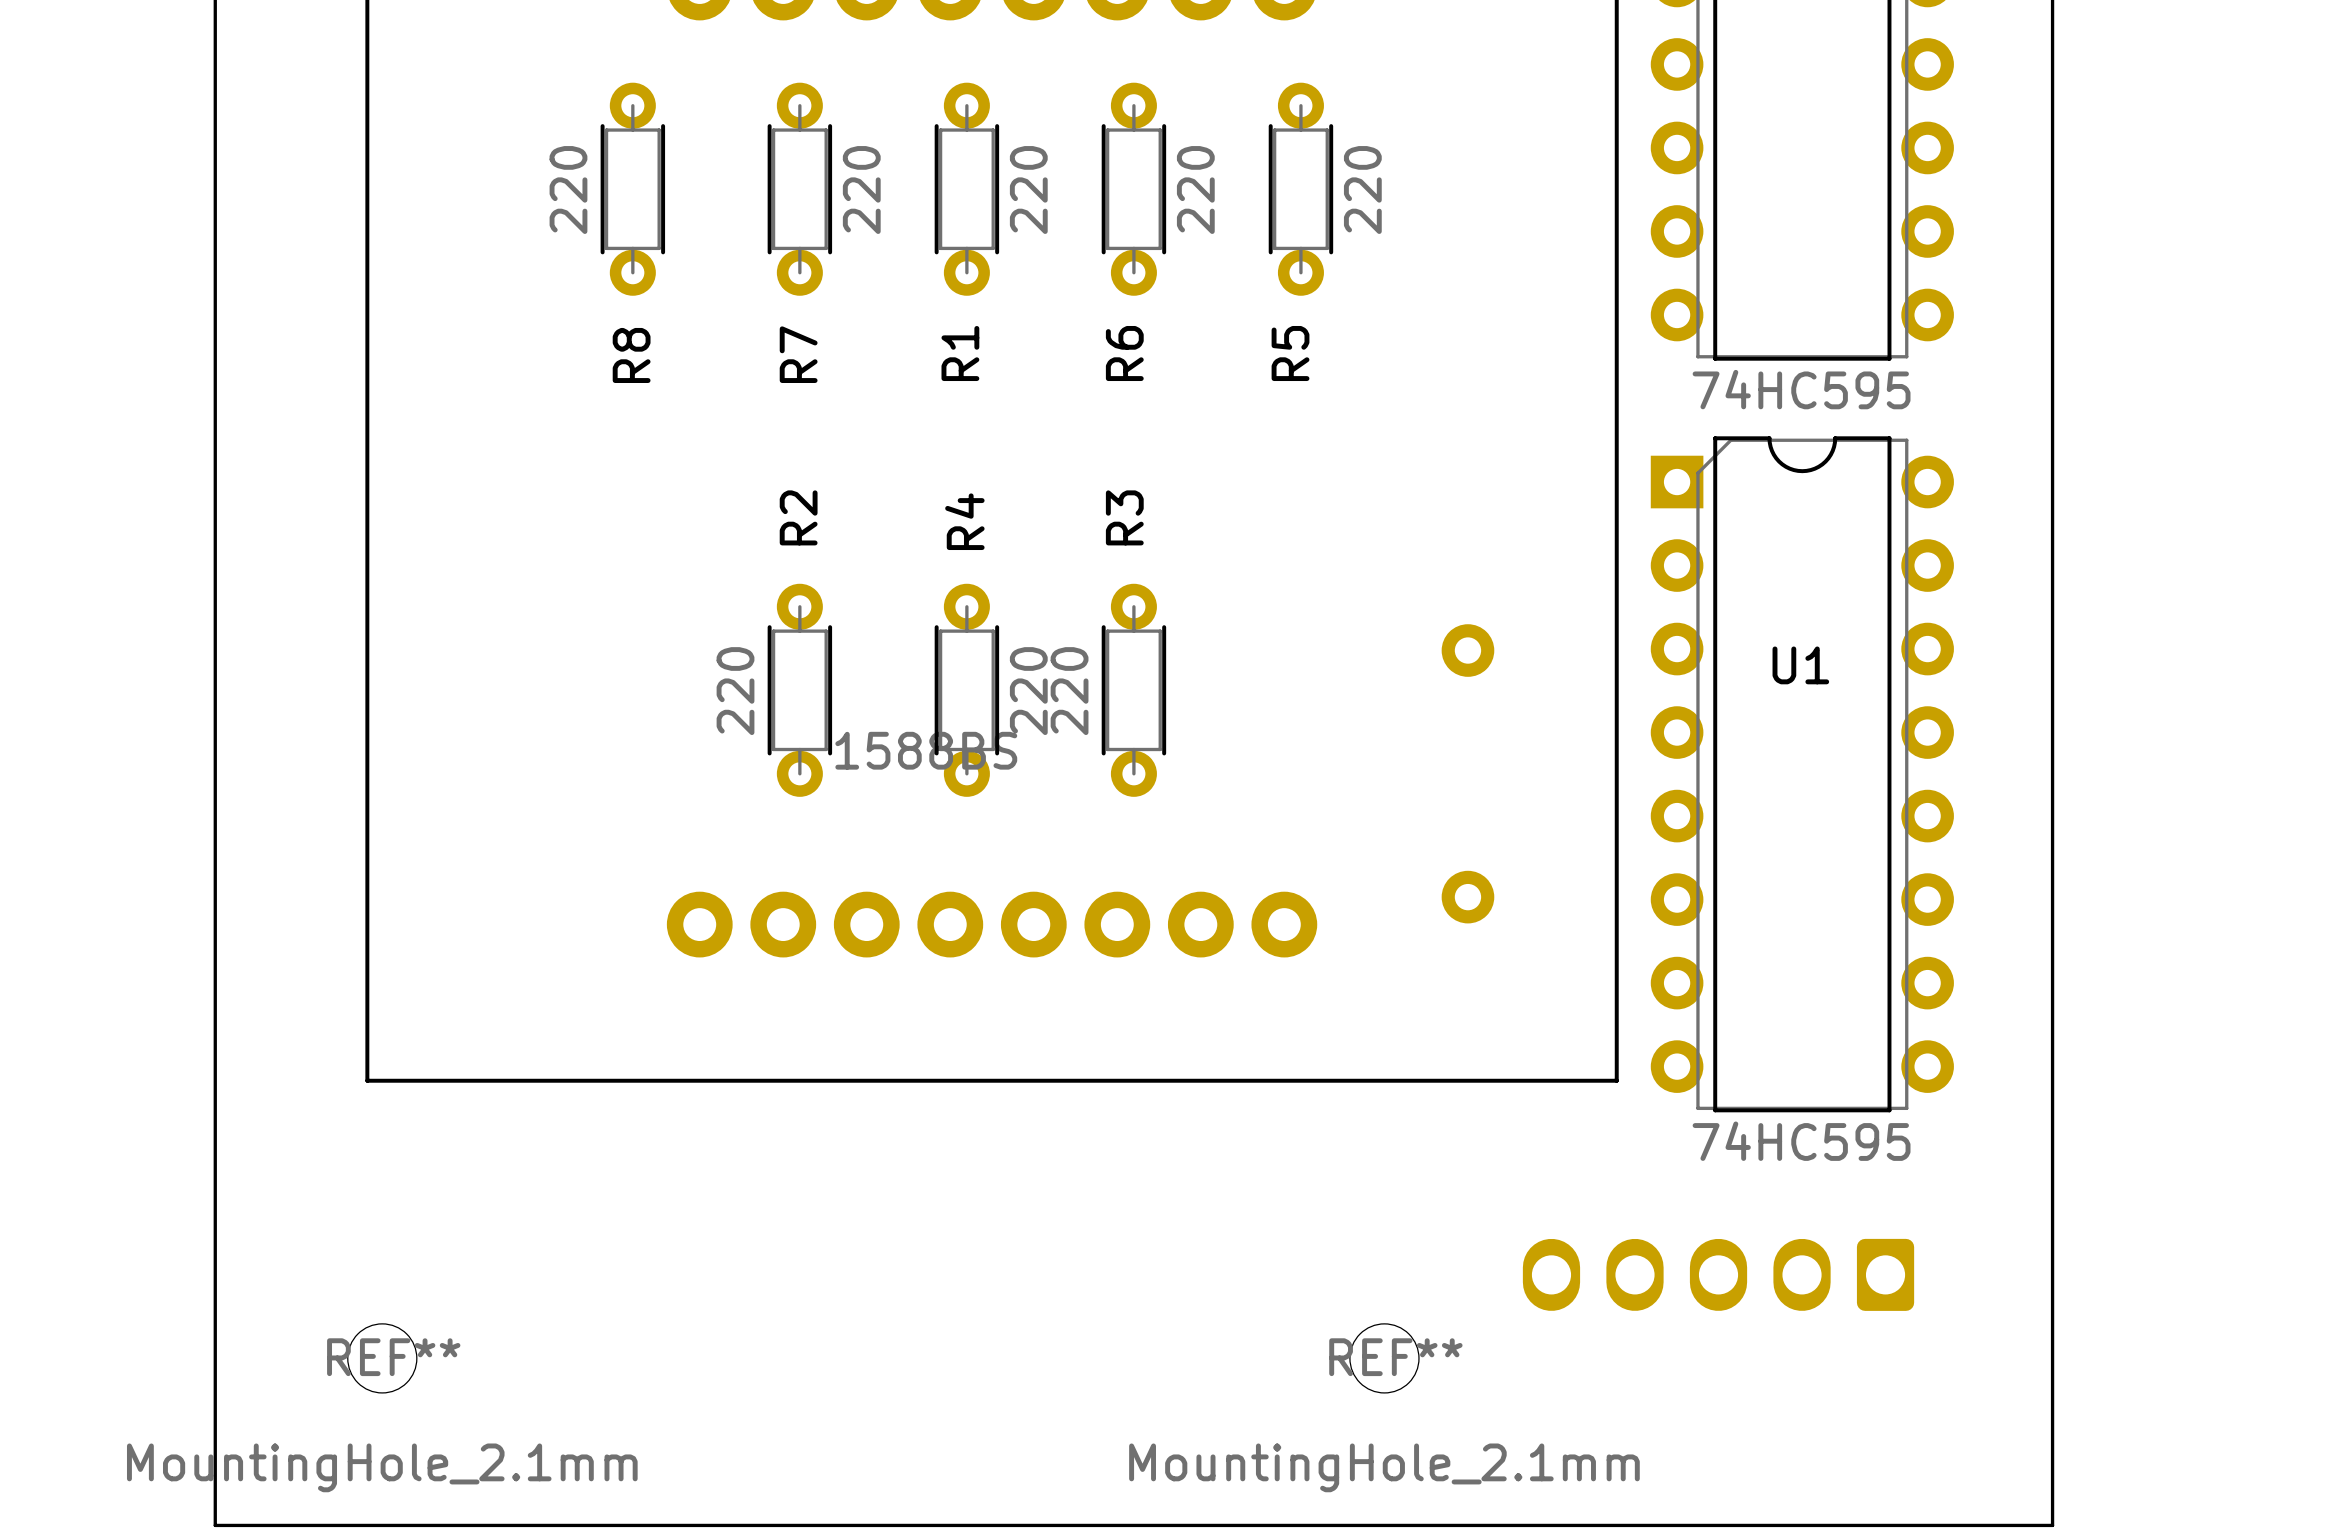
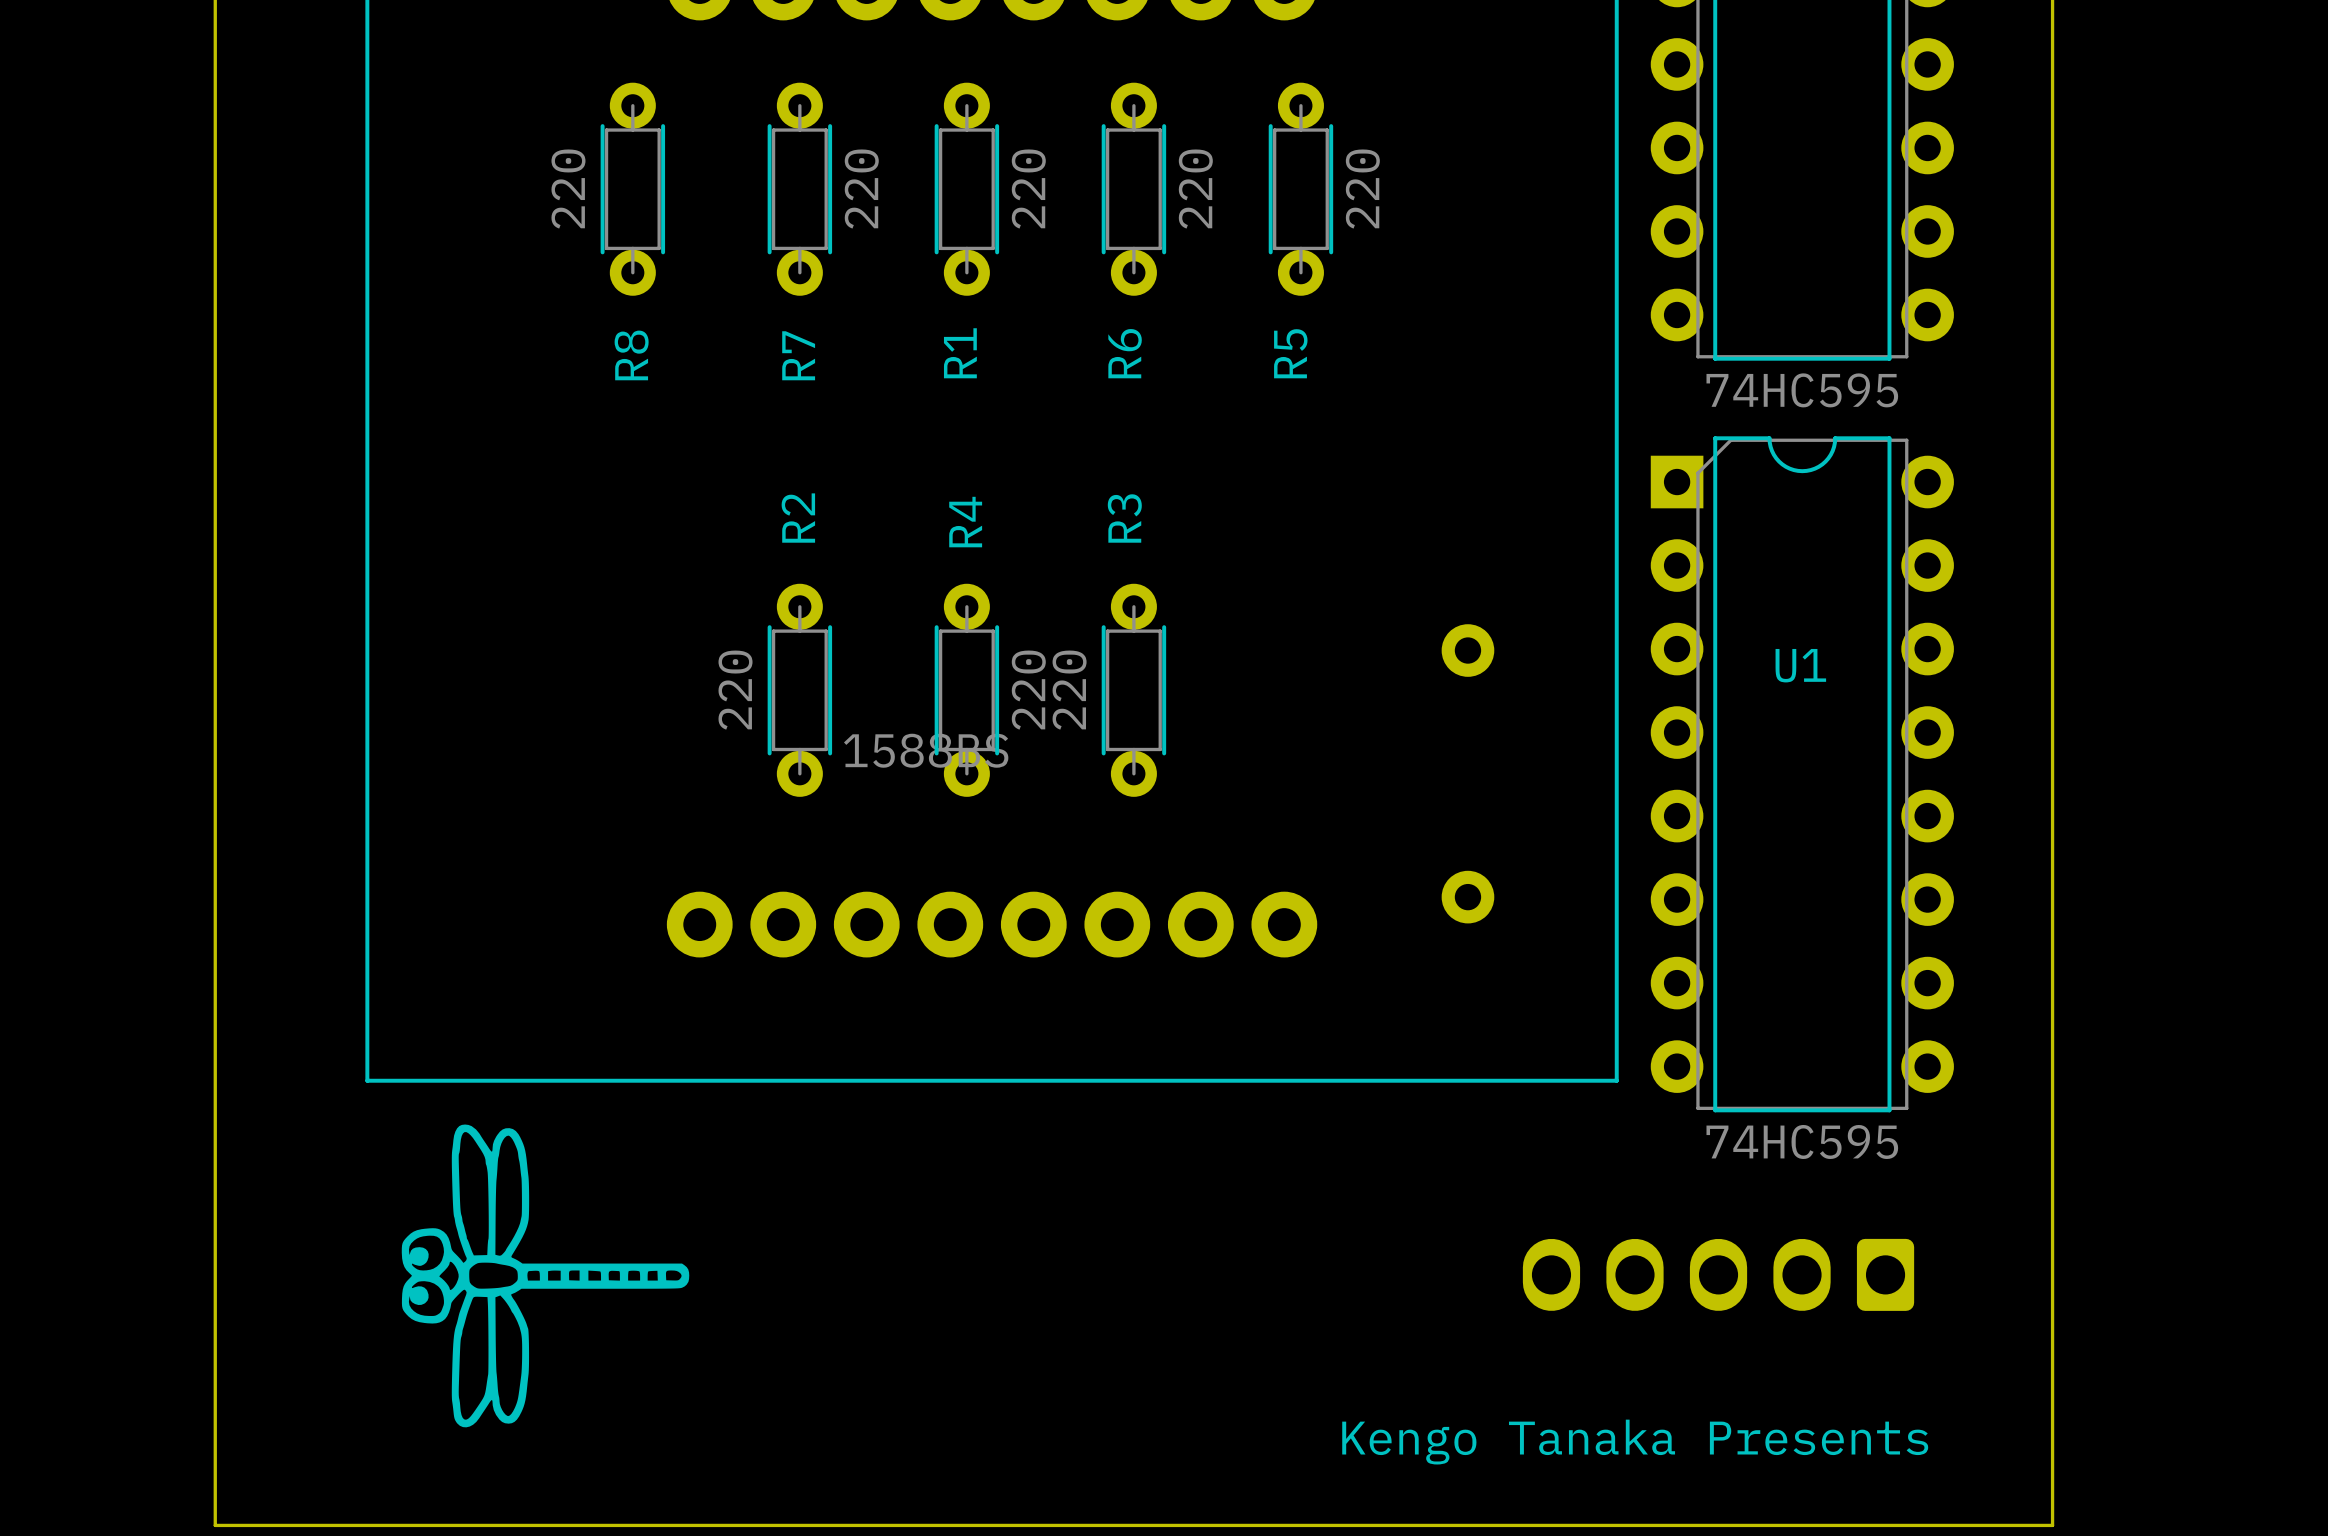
drawing: none -> [401, 1124, 690, 1428]
REF**: MountingHole_2.1mm (382, 1358) -> none
REF**: MountingHole_2.1mm (1384, 1358) -> none
text: none -> Kengo Tanaka Presents (1635, 1442)

